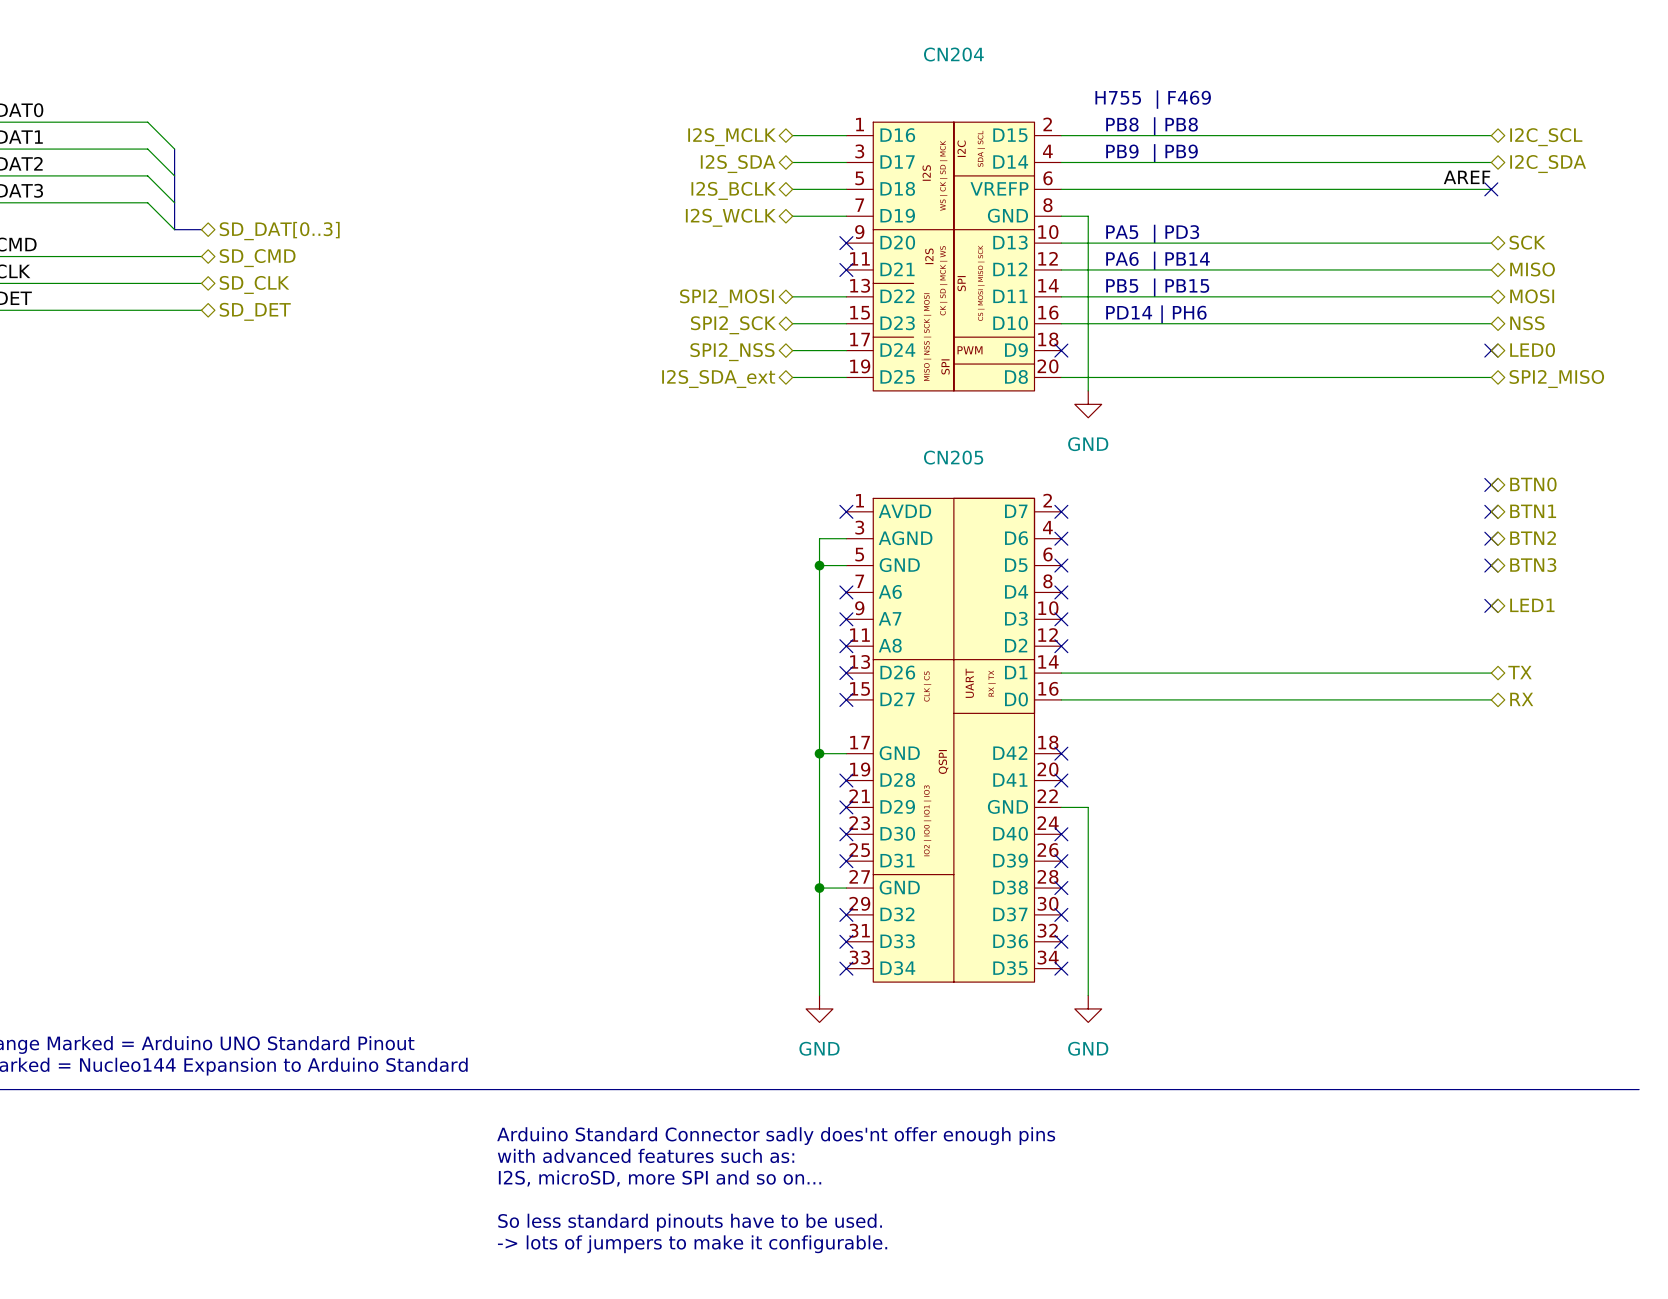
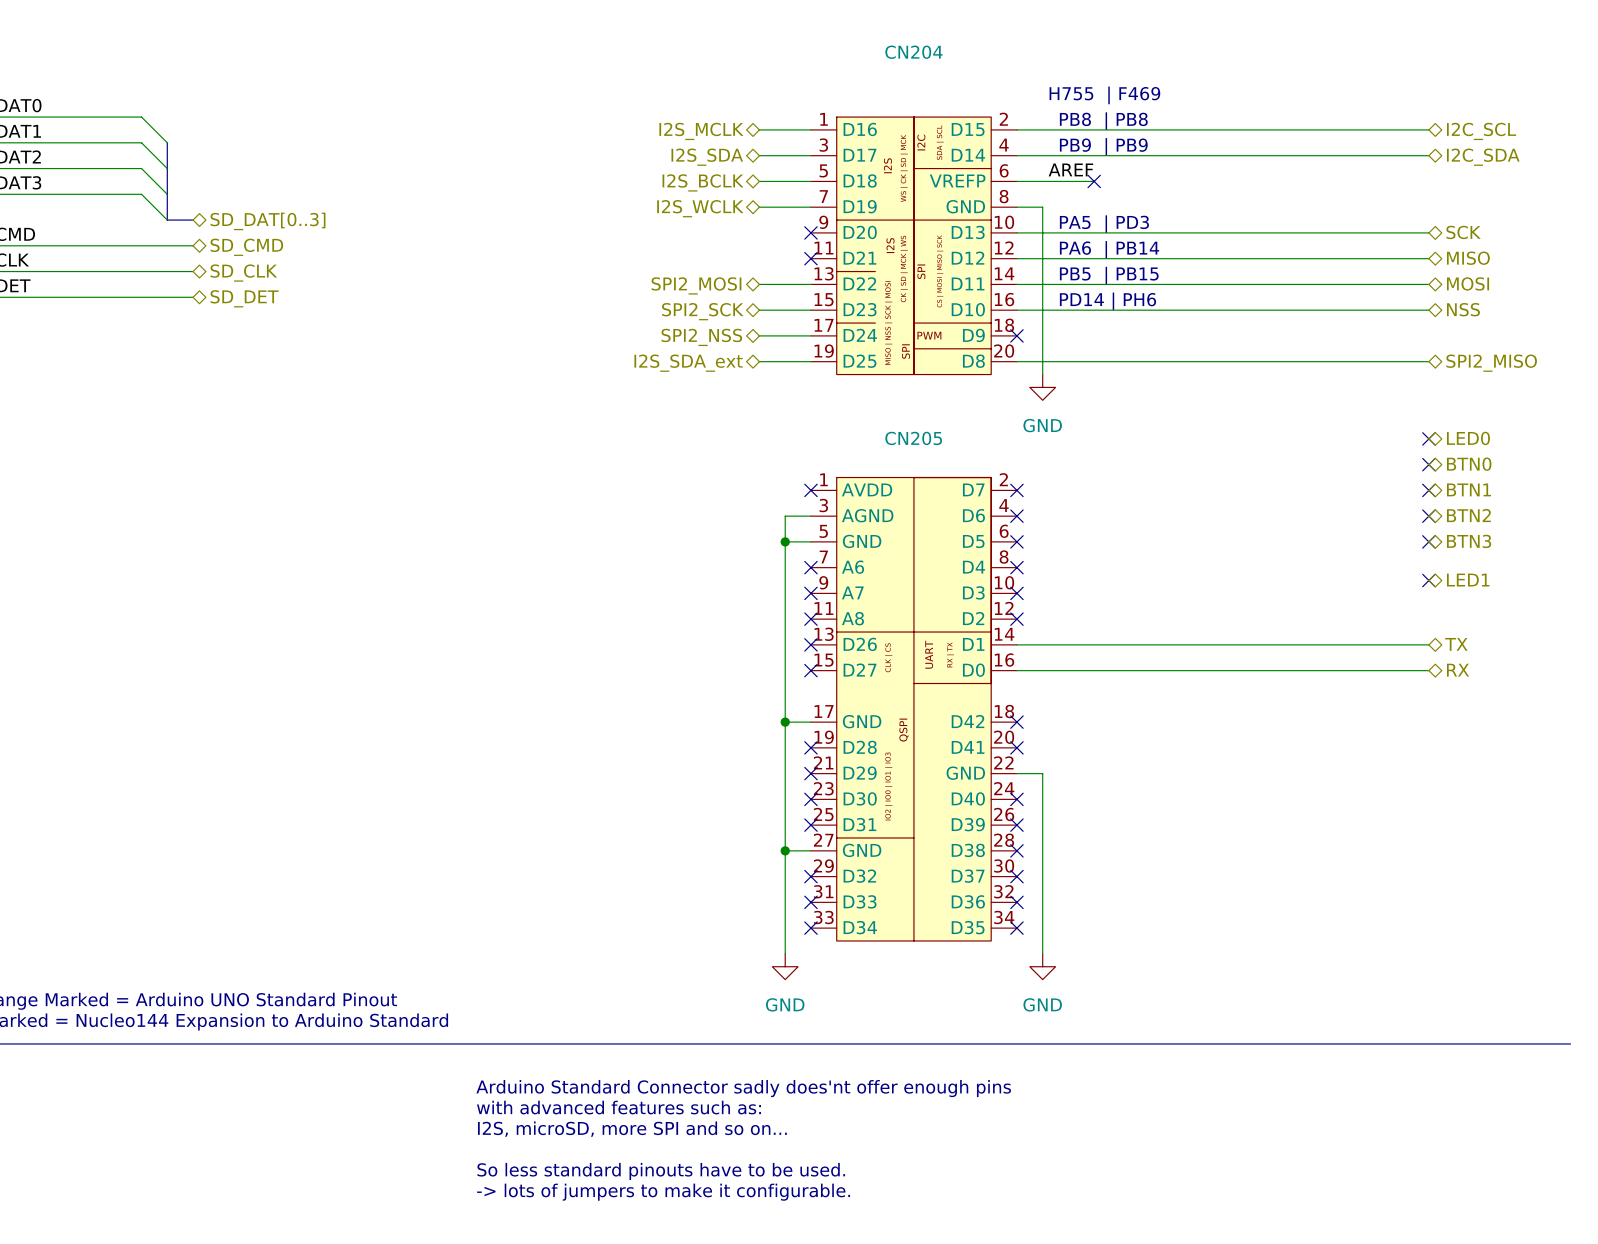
label: none -> AREF (1070, 169)
label: AREF (1467, 177) -> none
wire: (1141, 189) (1491, 189) -> none
no-connect mark: none -> (1094, 181)
no-connect mark: (1491, 189) -> none
no-connect mark: (1491, 350) -> none
hierarchical label position: LED0 (1532, 350) -> LED0 (1468, 438)
no-connect mark: none -> (1428, 438)

